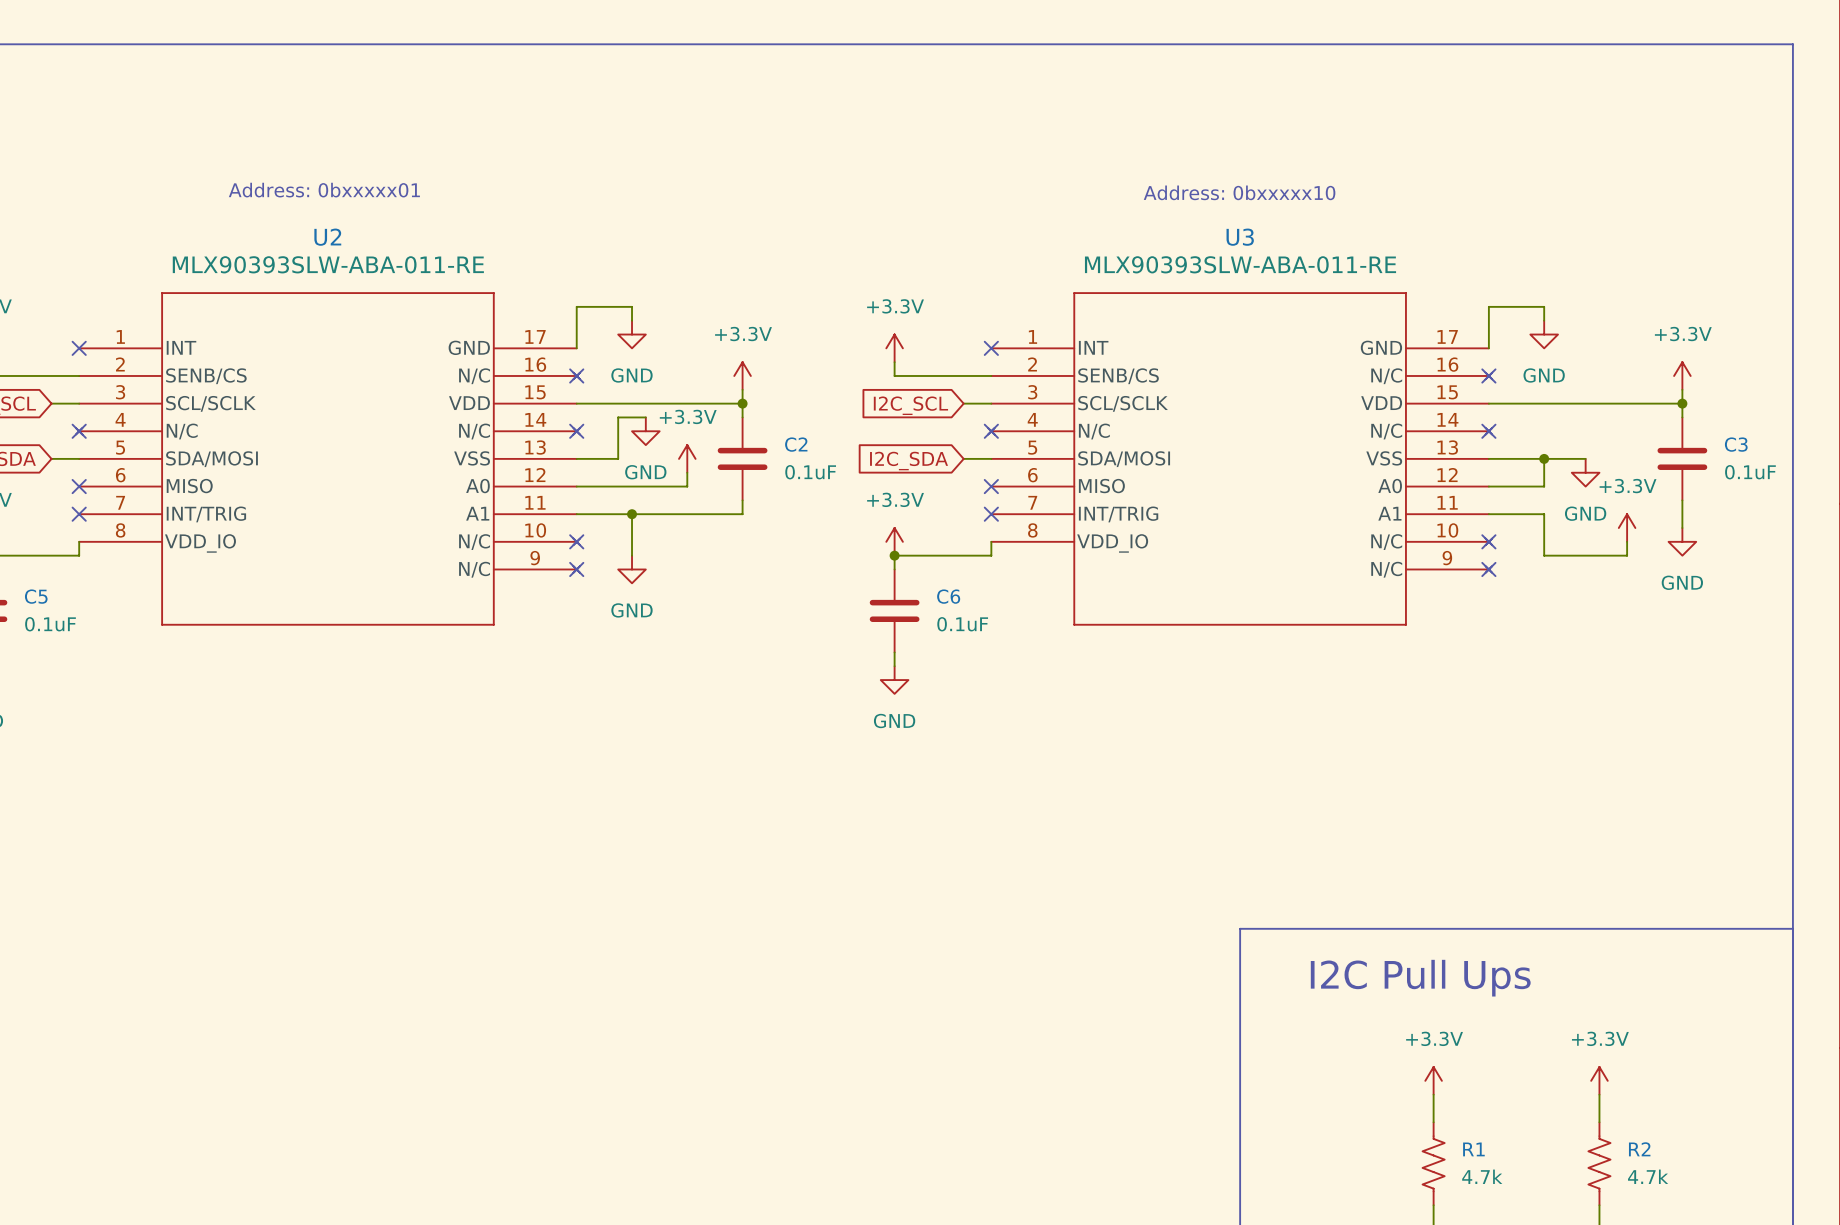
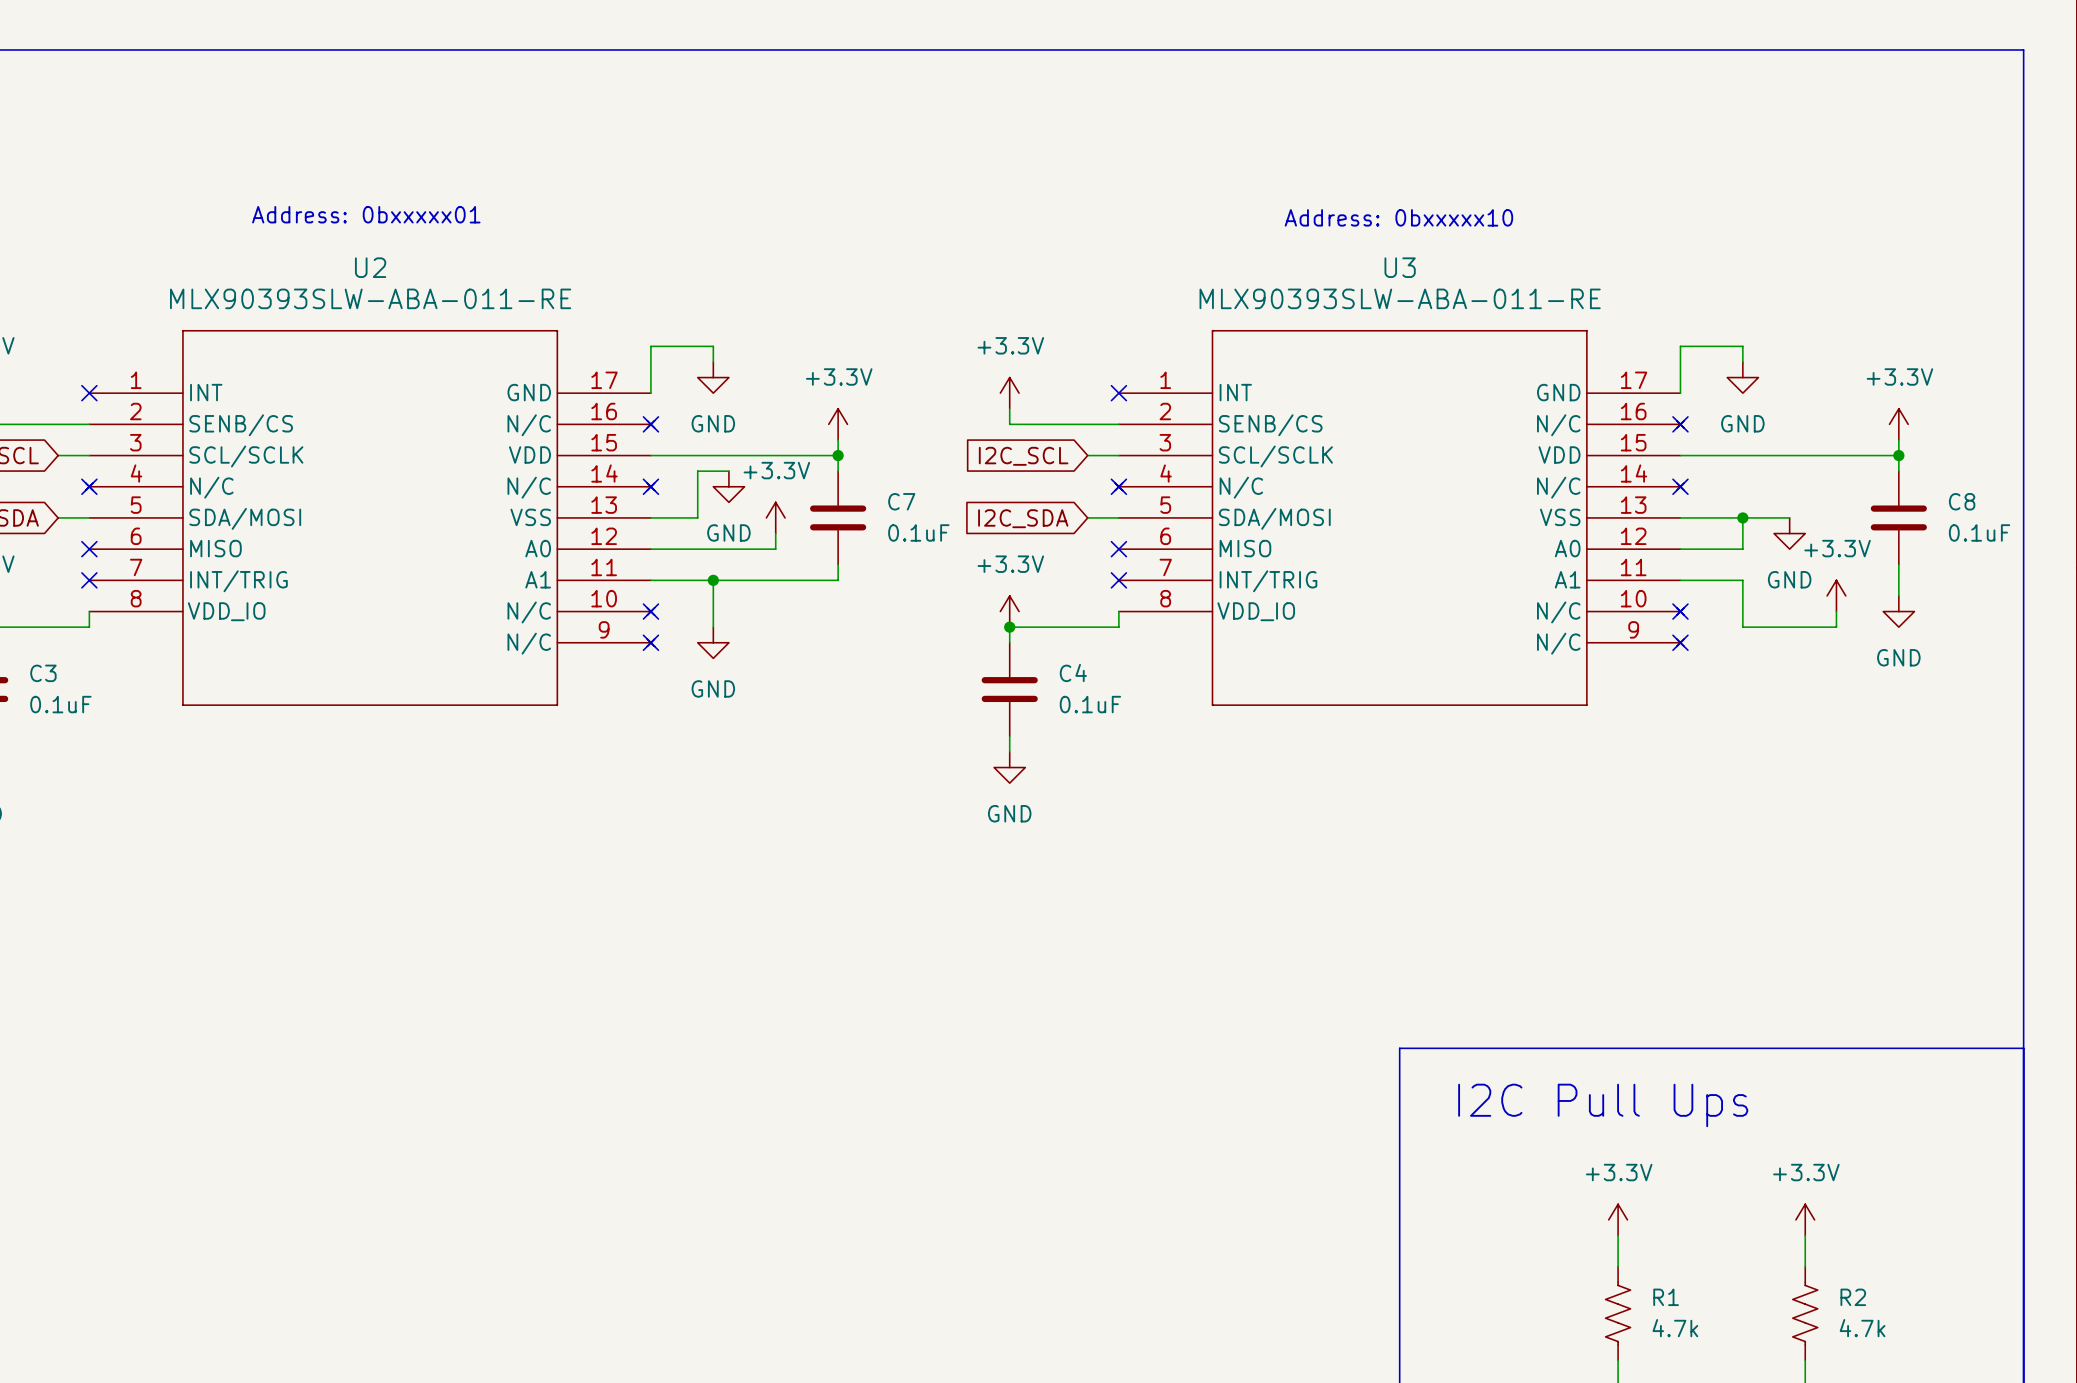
C2 name: C2 (796, 444) -> C7 (901, 501)
C3 name: C3 (1736, 444) -> C8 (1962, 501)
C5 name: C5 (36, 596) -> C3 (43, 673)
C6 name: C6 (948, 596) -> C4 (1073, 672)

